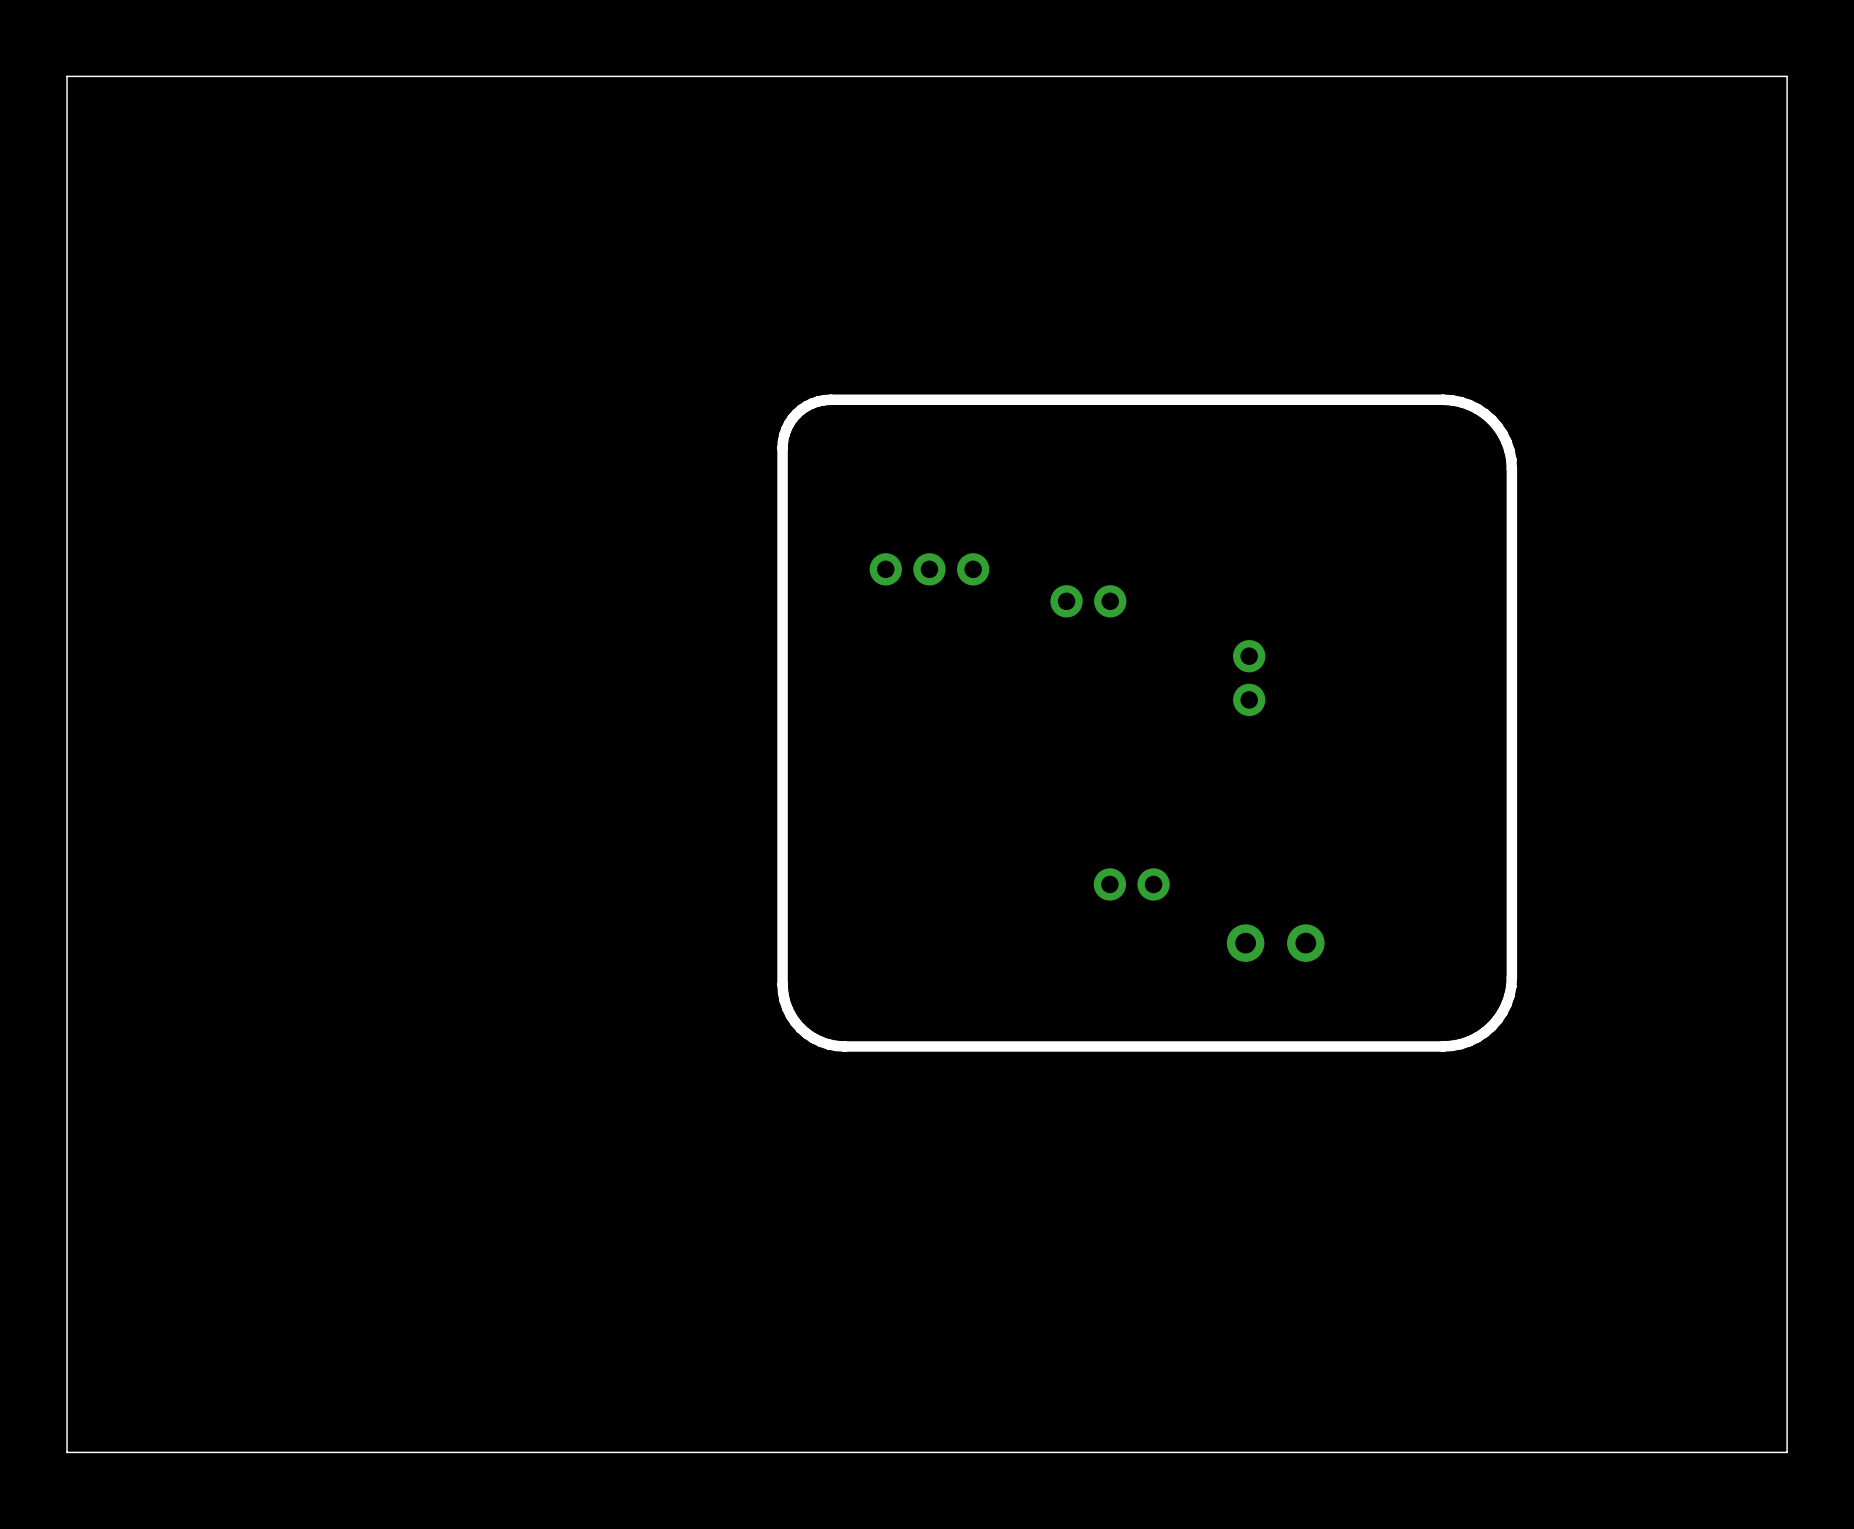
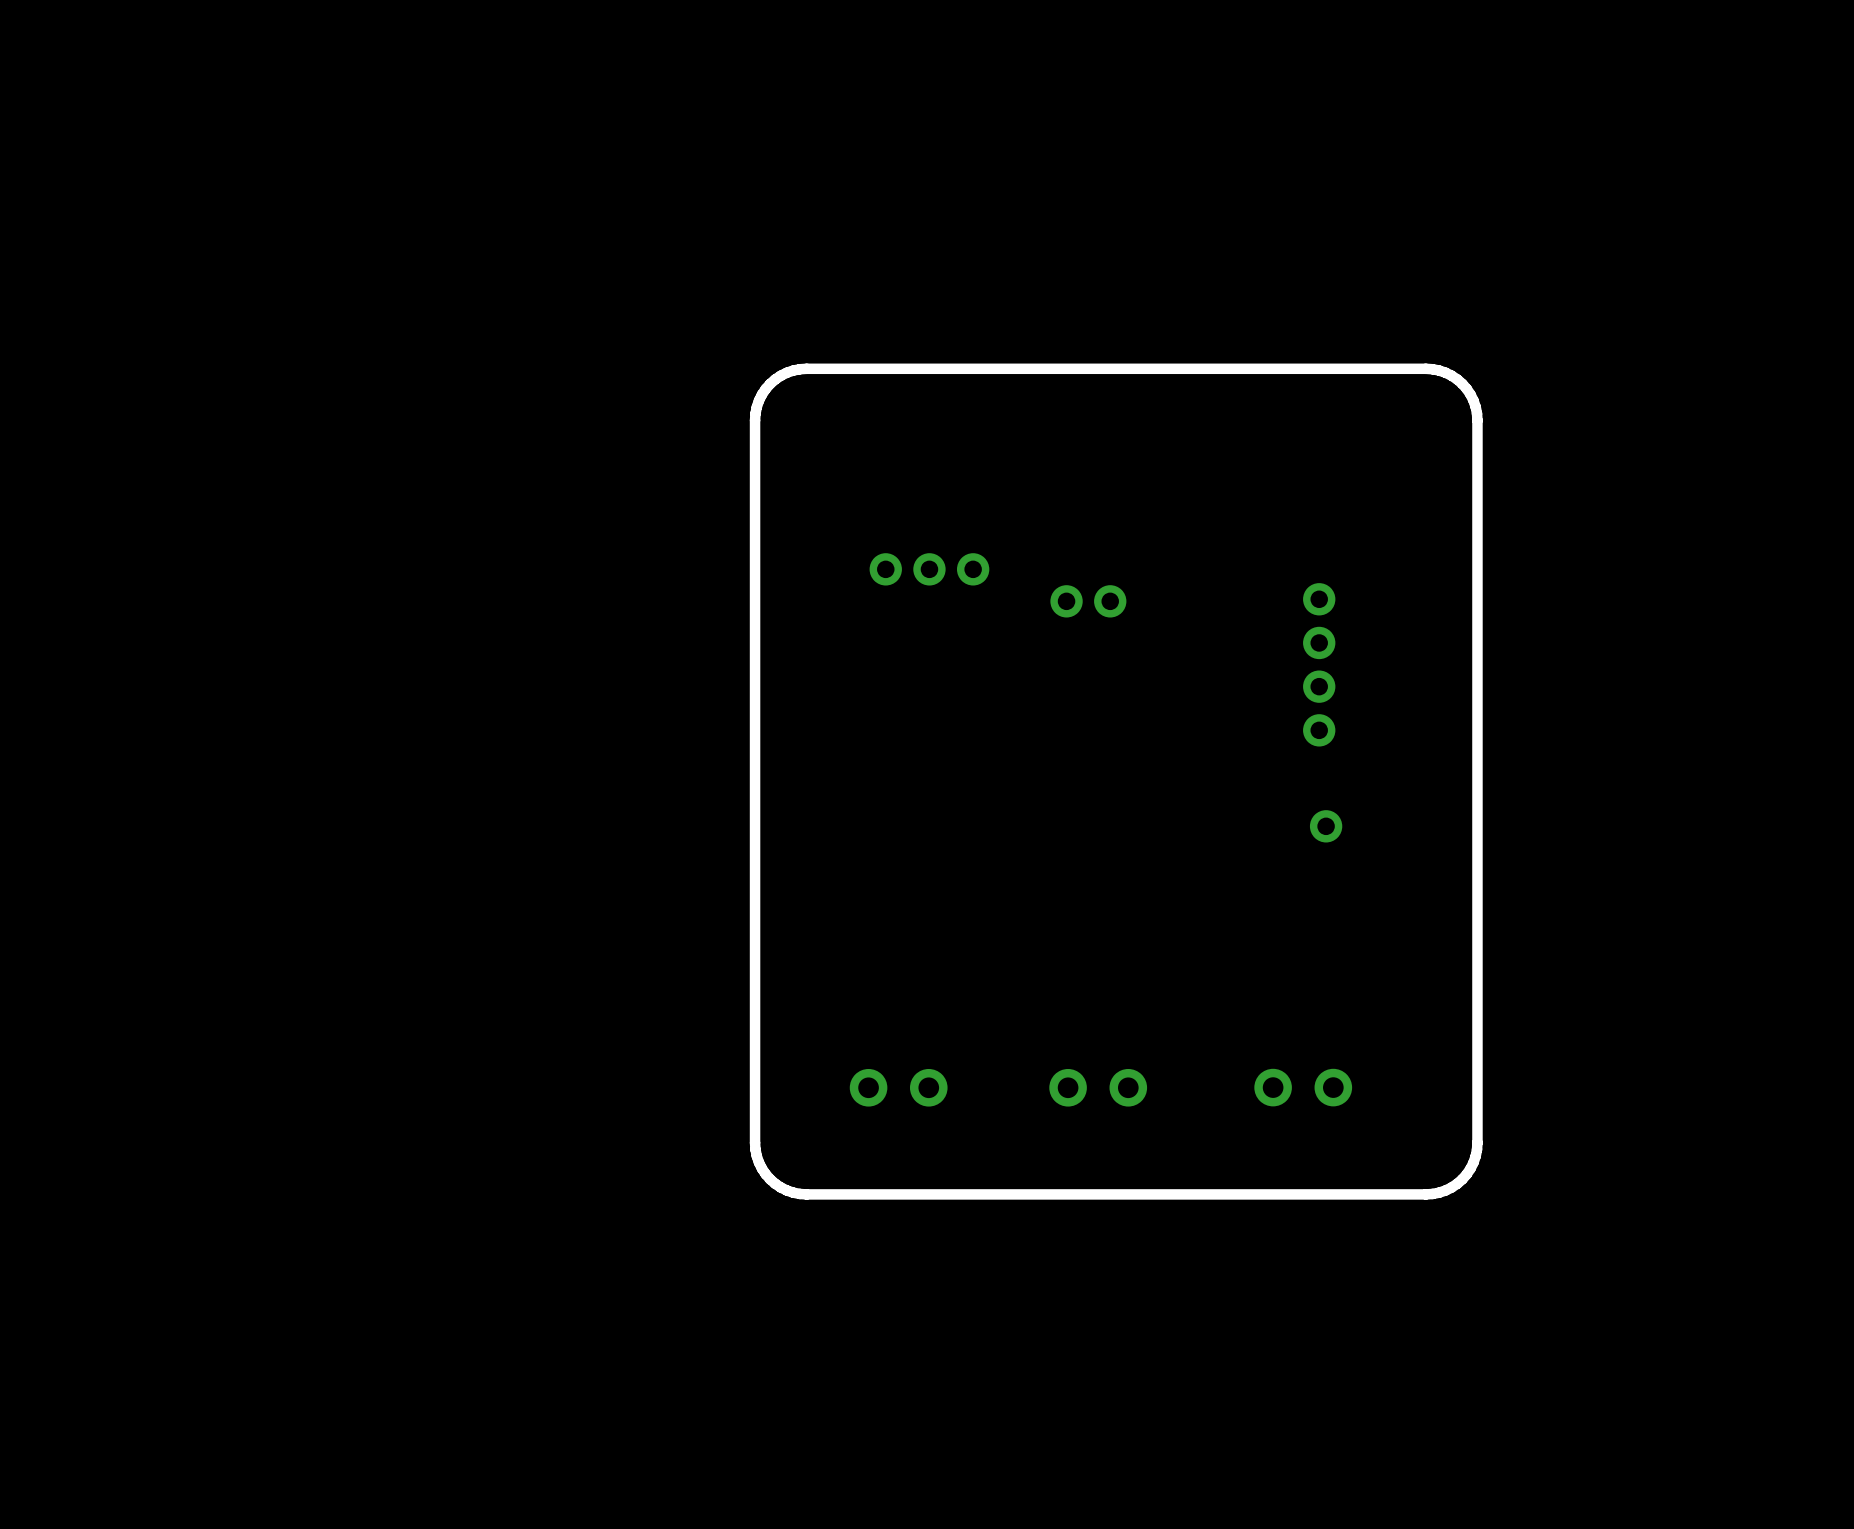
board edge: (1787, 76) (67, 76) (67, 1452) (1787, 1452) (1787, 76) -> none
board edge: (1443, 399) (1469, 404) (1491, 419) (1502, 434) (1511, 459) (1511, 977) (1506, 1004) (1491, 1026) (1469, 1041) (1443, 1046) (844, 1046) (820, 1041) (800, 1028) (787, 1008) (782, 984) (782, 447) (786, 429) (796, 413) (812, 403) (830, 399) (1443, 399) -> (1425, 368) (1445, 372) (1462, 383) (1473, 400) (1477, 420) (1477, 1142) (1475, 1156) (1466, 1174) (1451, 1187) (1439, 1192) (1425, 1194) (806, 1194) (793, 1192) (775, 1183) (761, 1168) (756, 1156) (755, 1142) (755, 420) (756, 407) (765, 388) (780, 375) (793, 370) (806, 368) (1425, 368)
part: none -> (1319, 664)
part: (1249, 678) -> none
part: none -> (1326, 826)
part: (1131, 884) -> none
part: (1275, 943) -> none
part: none -> (898, 1087)
part: none -> (1098, 1087)
part: none -> (1303, 1087)

